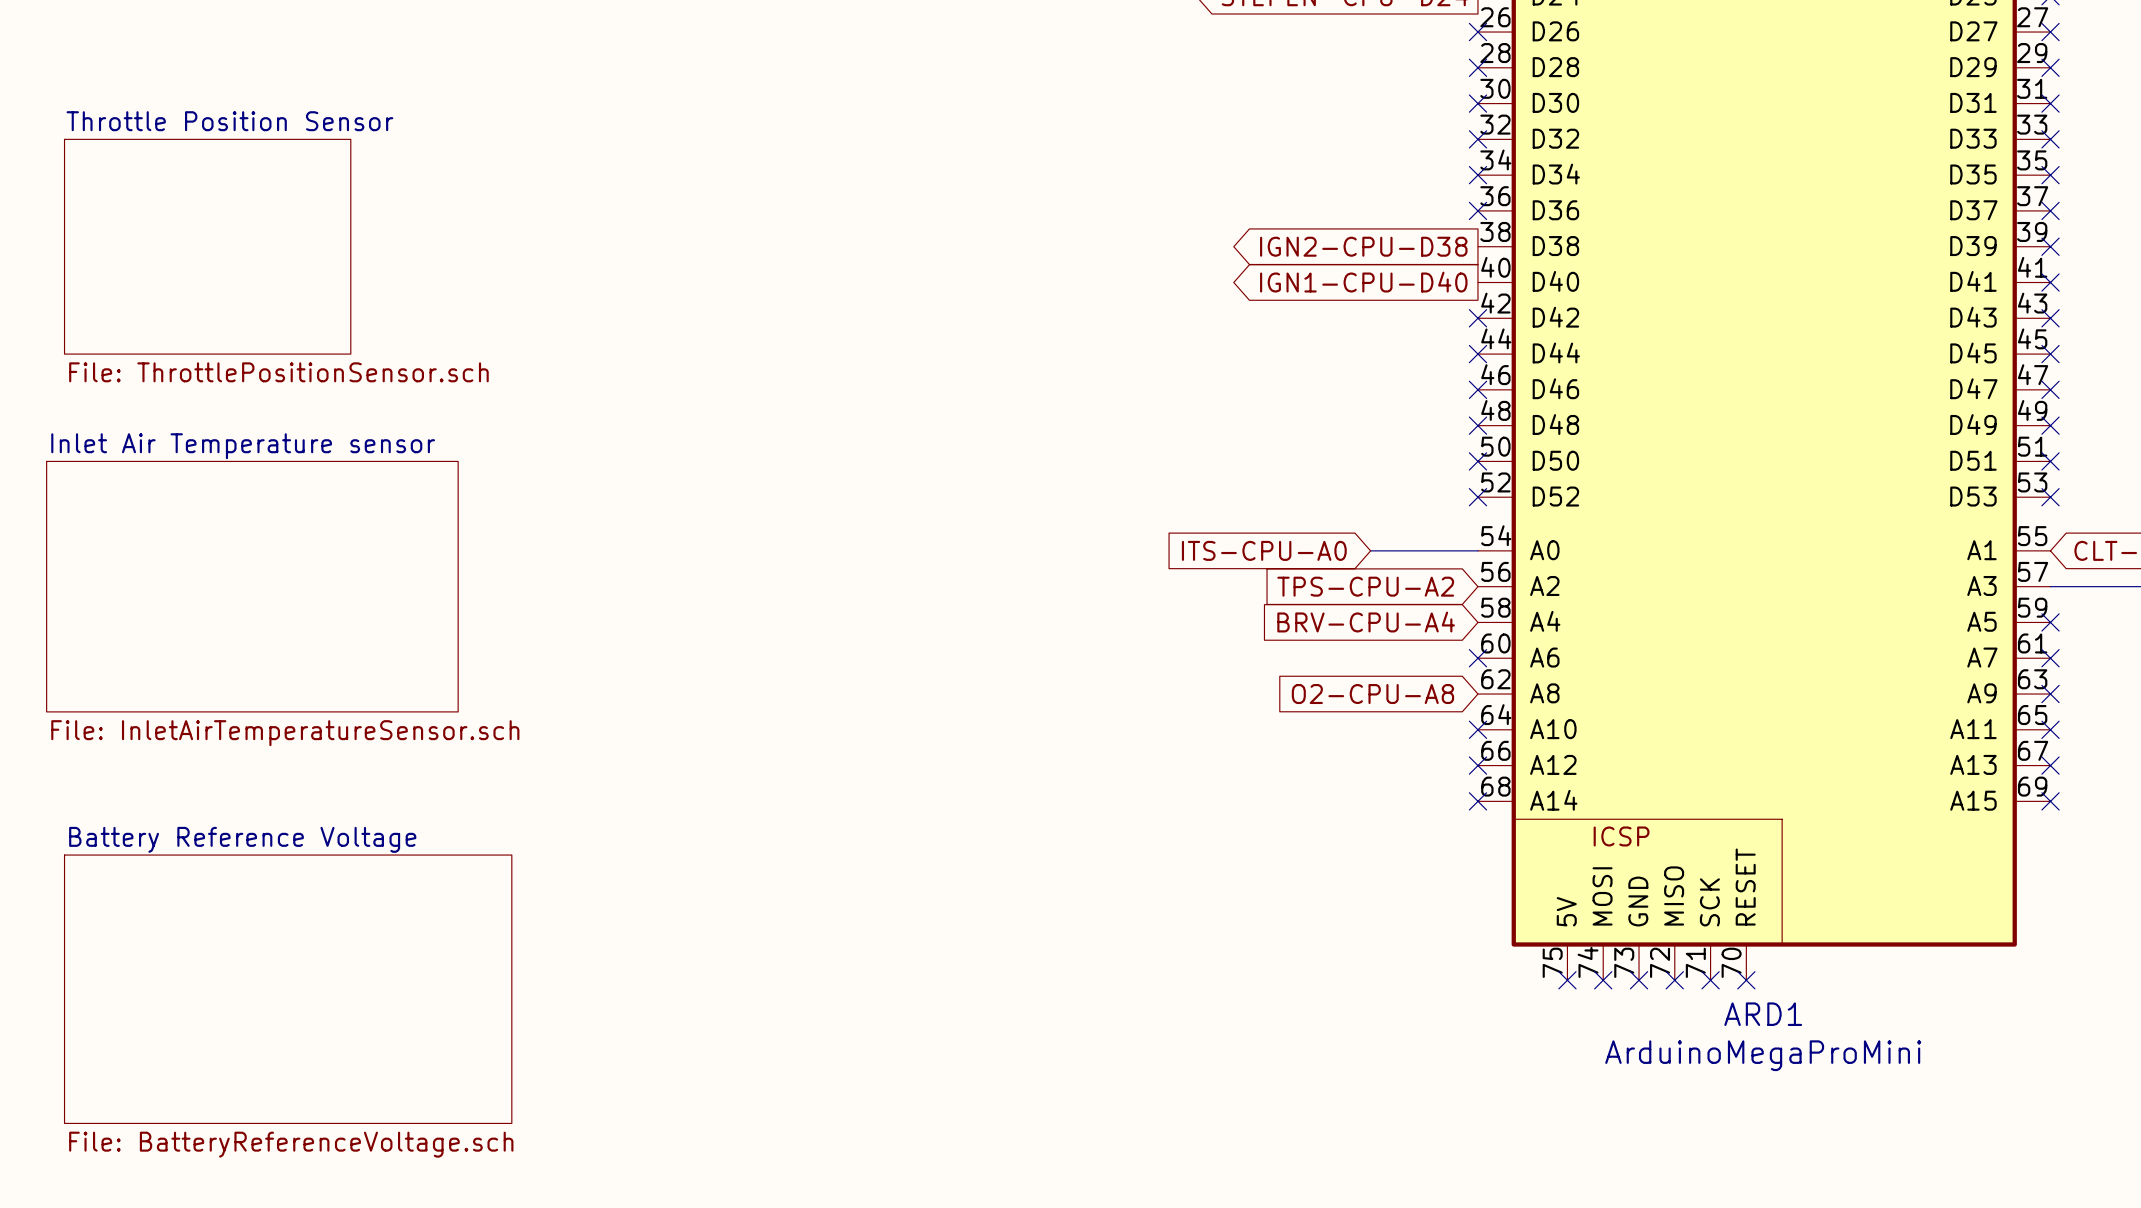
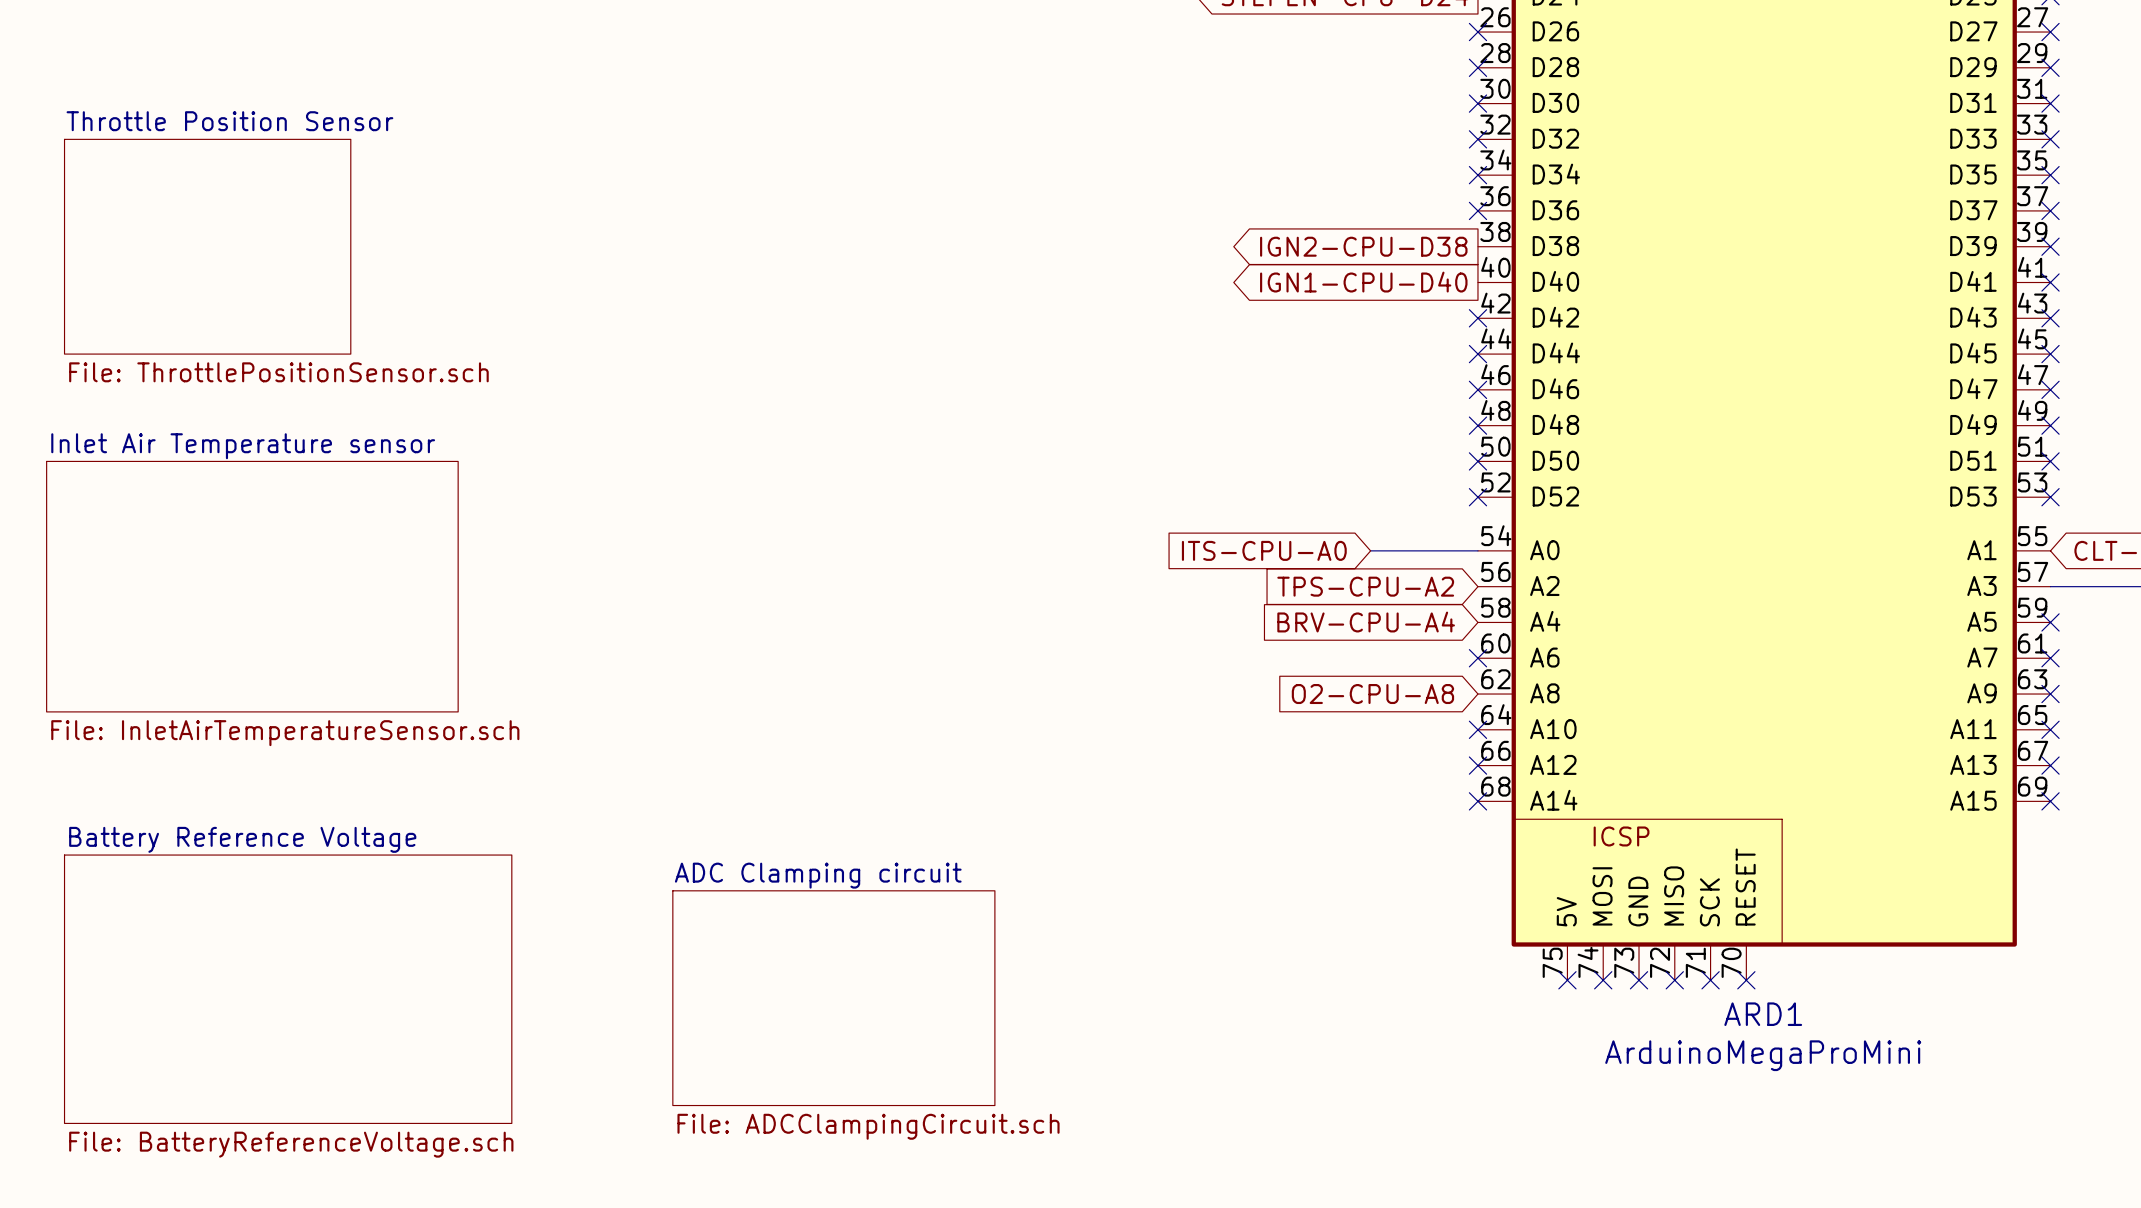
sheet ADC Clamping circuit: none -> File: ADCClampingCircuit.sch (833, 998)

